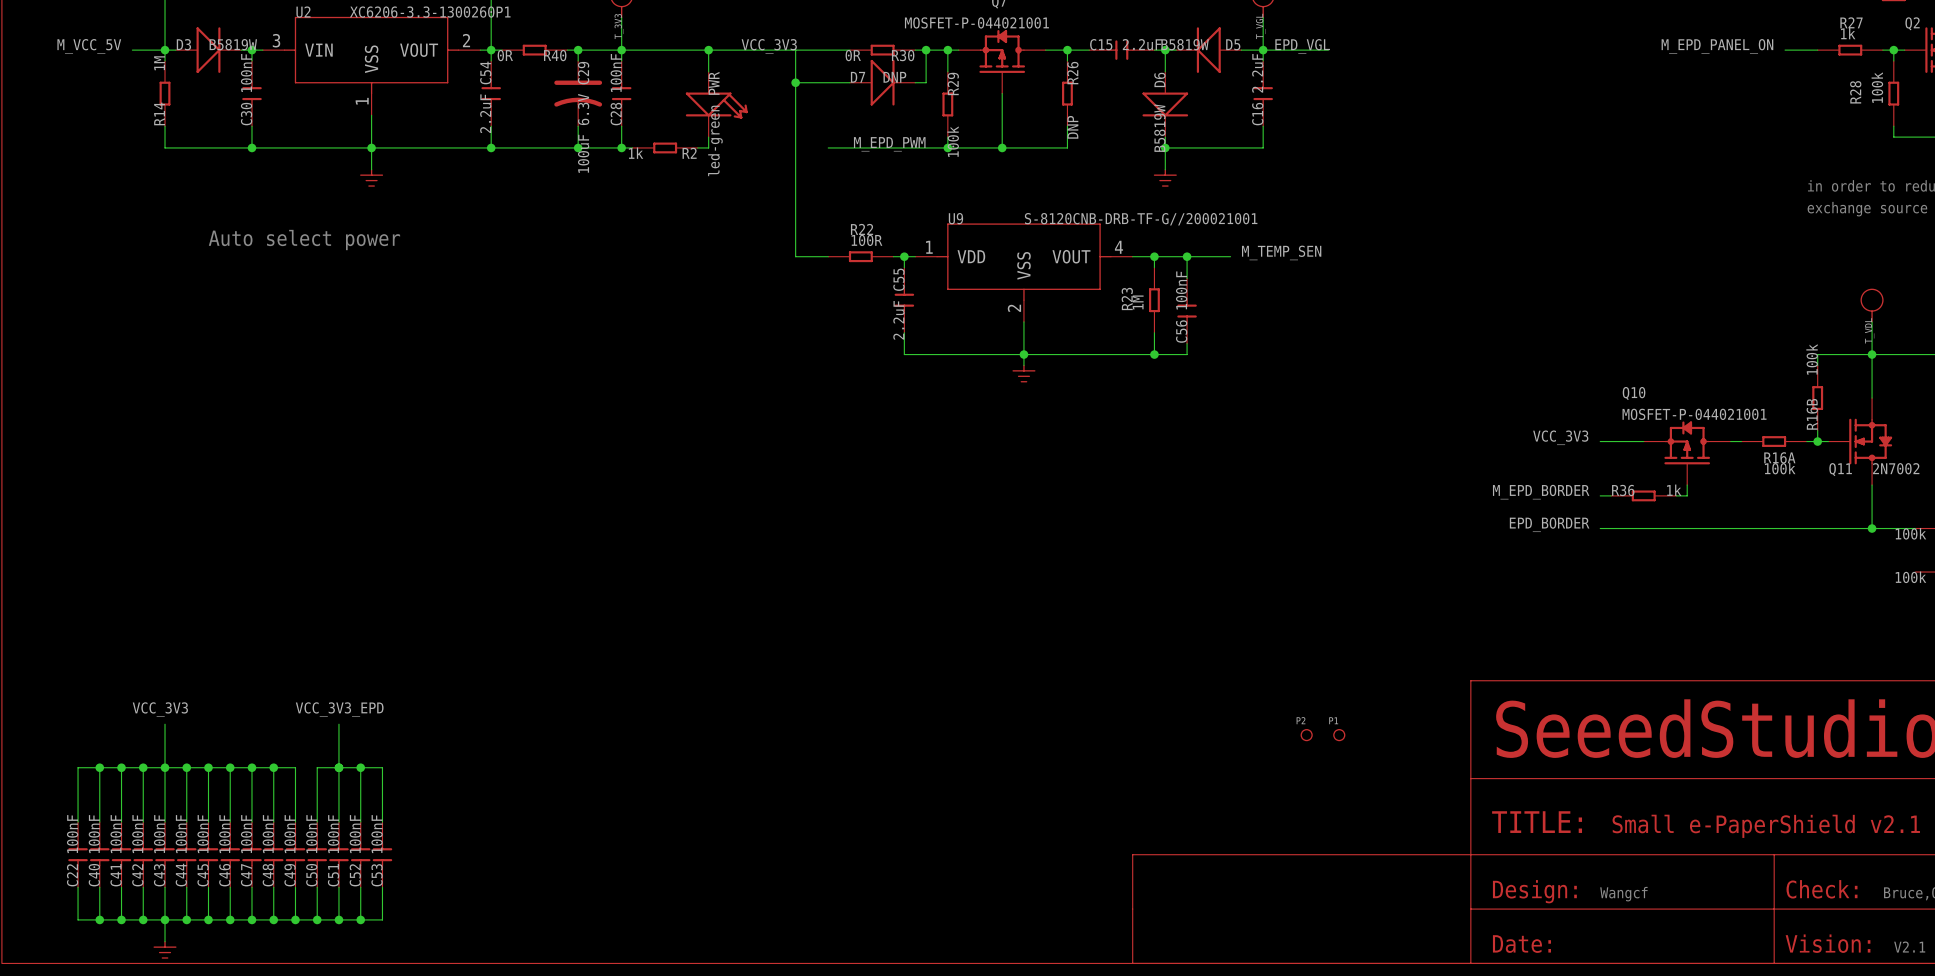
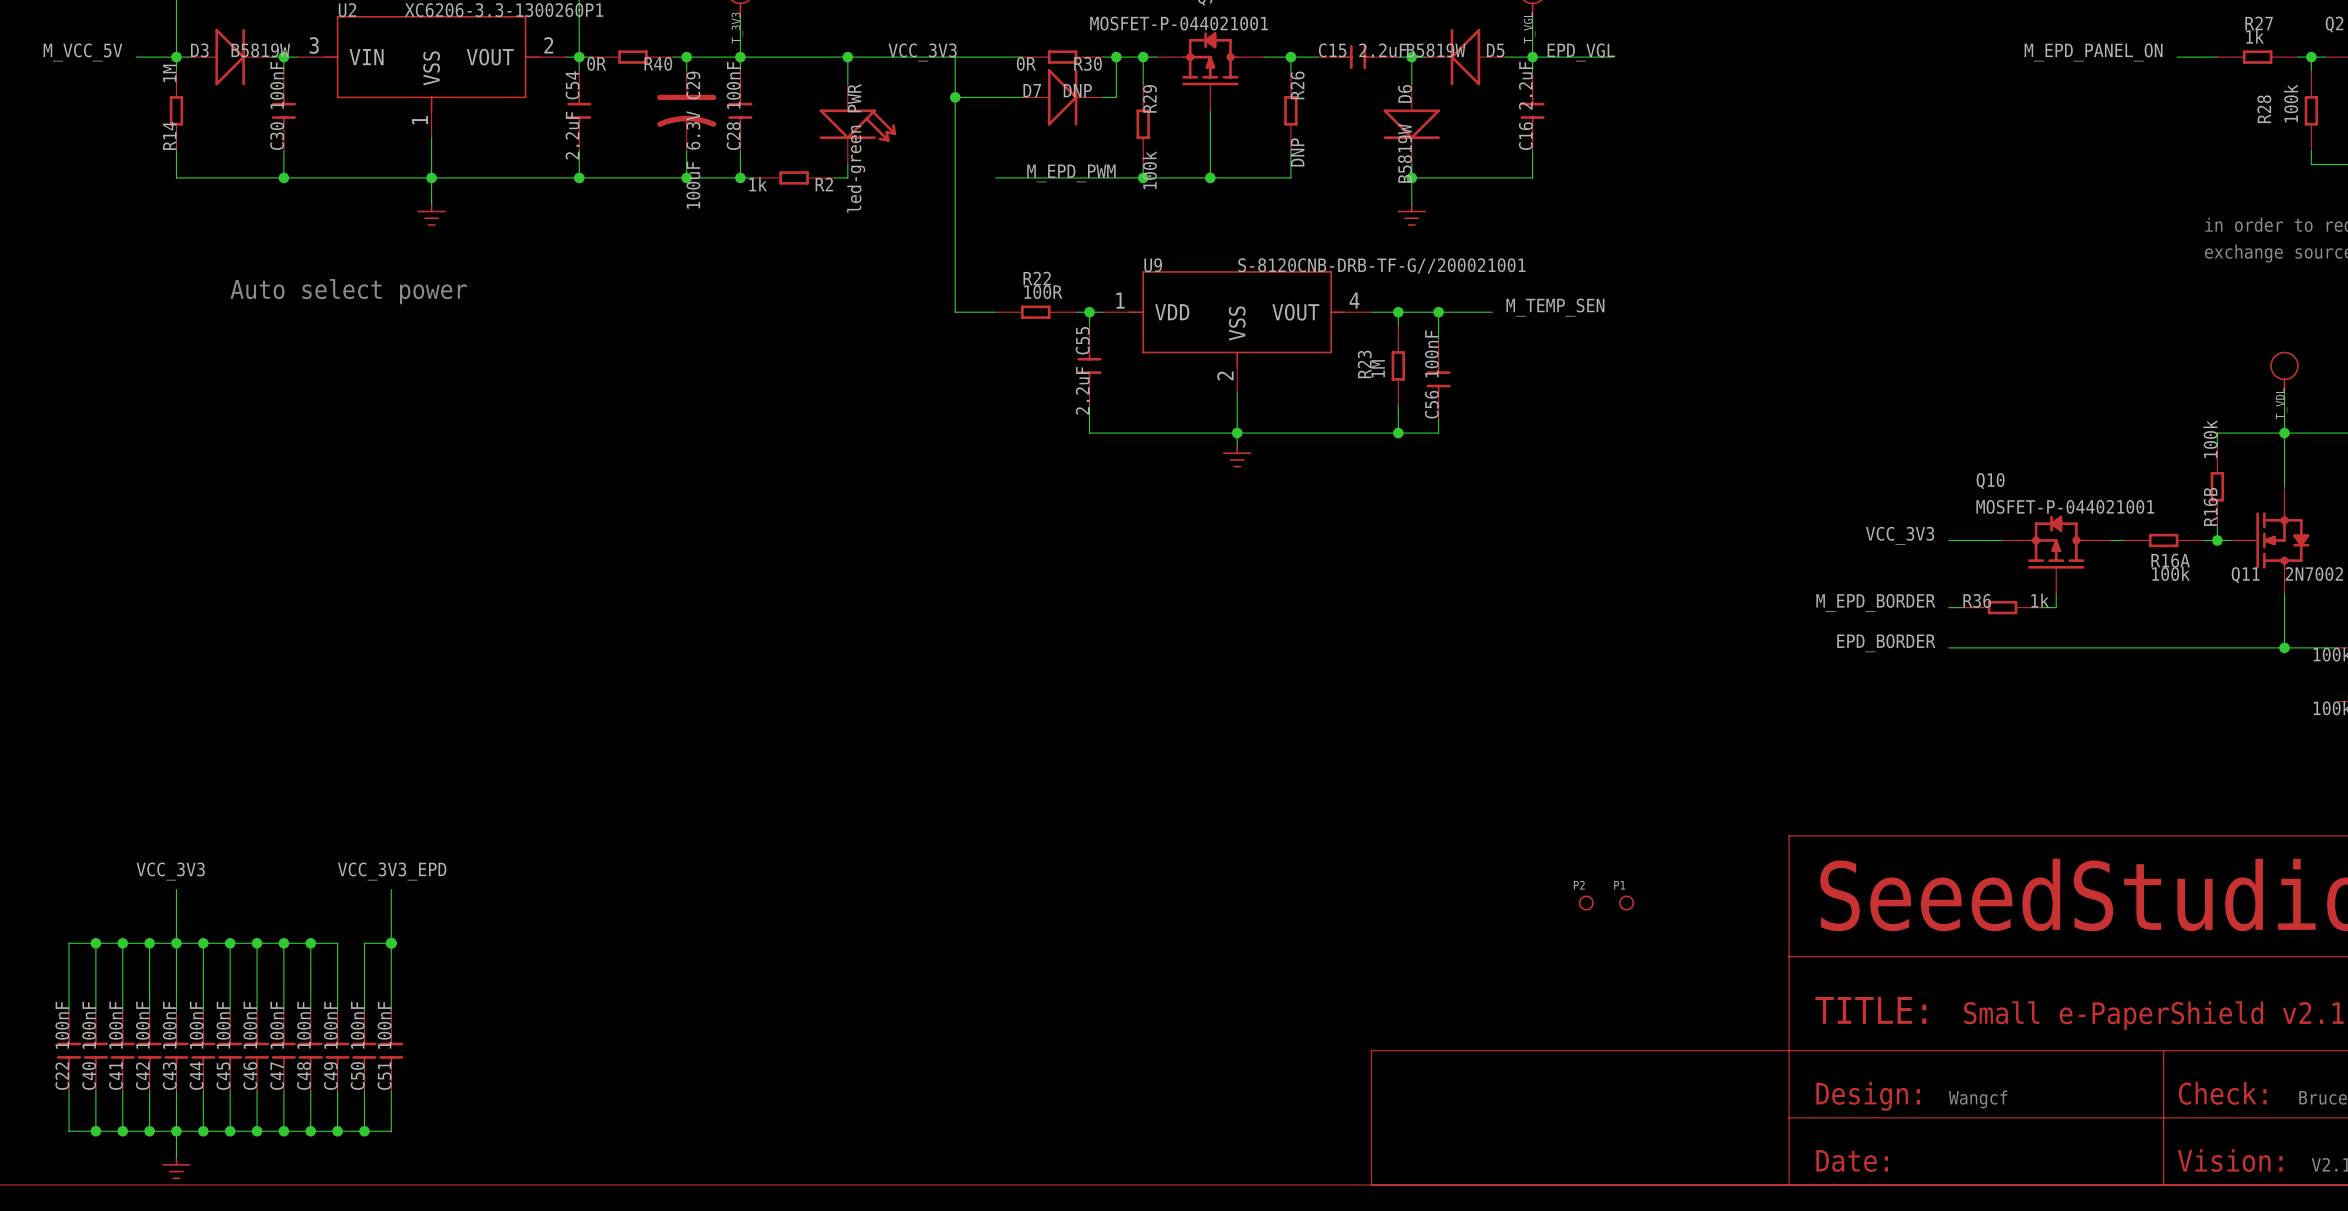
wire: (338, 767) (382, 767) (382, 822) -> none
wire: (360, 767) (360, 822) -> none
junction: (360, 767) -> none
C52: 100nF (360, 854) -> none
C53: 100nF (382, 854) -> none
wire: (360, 887) (360, 919) -> none
wire: (382, 887) (382, 919) (338, 919) -> none
junction: (338, 919) -> none
junction: (360, 919) -> none

